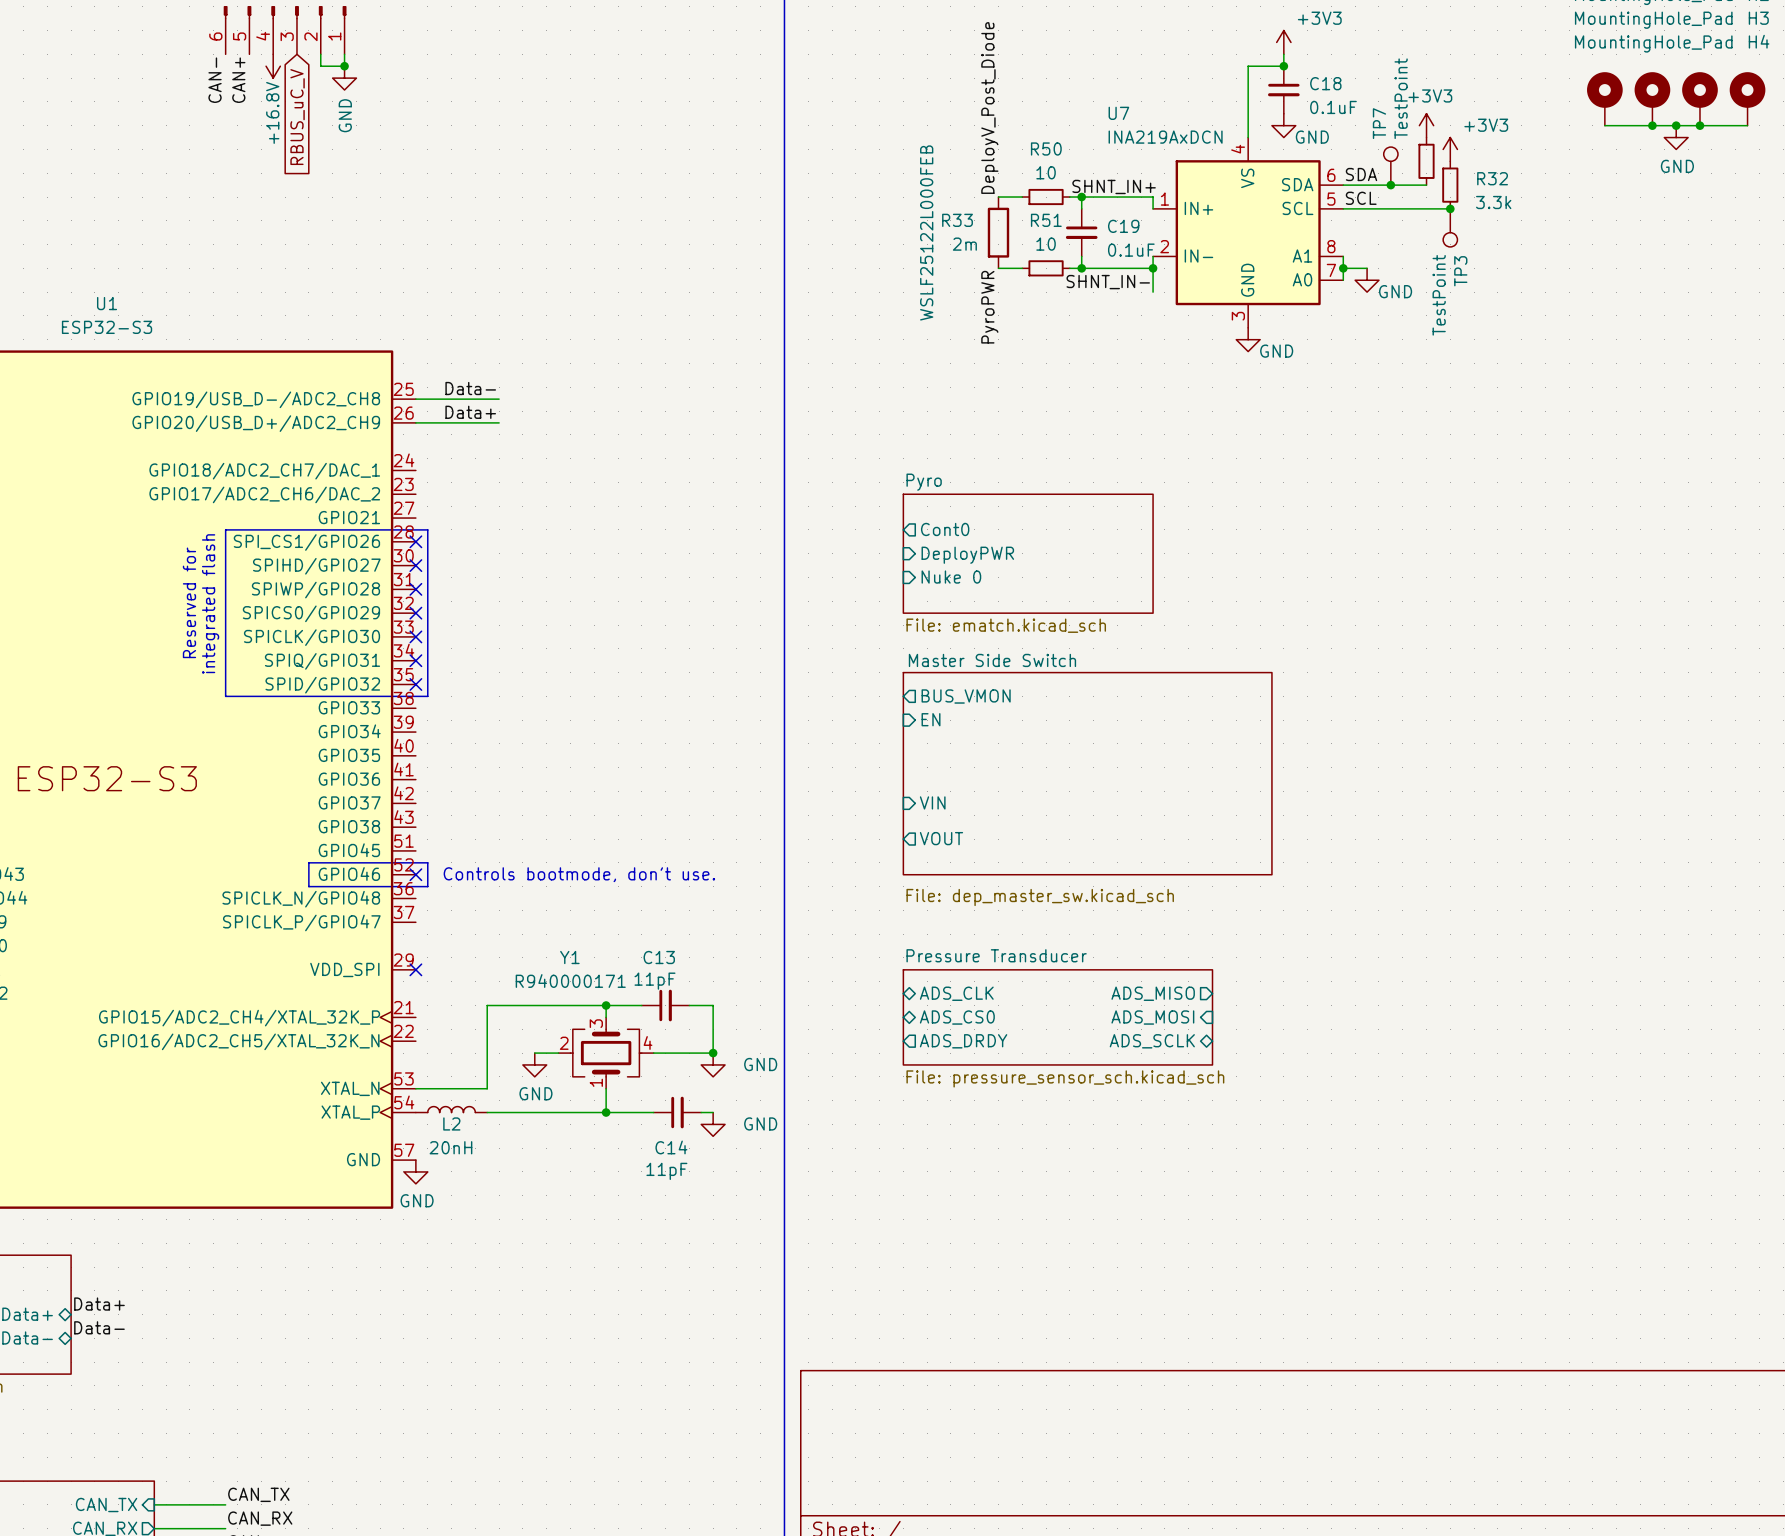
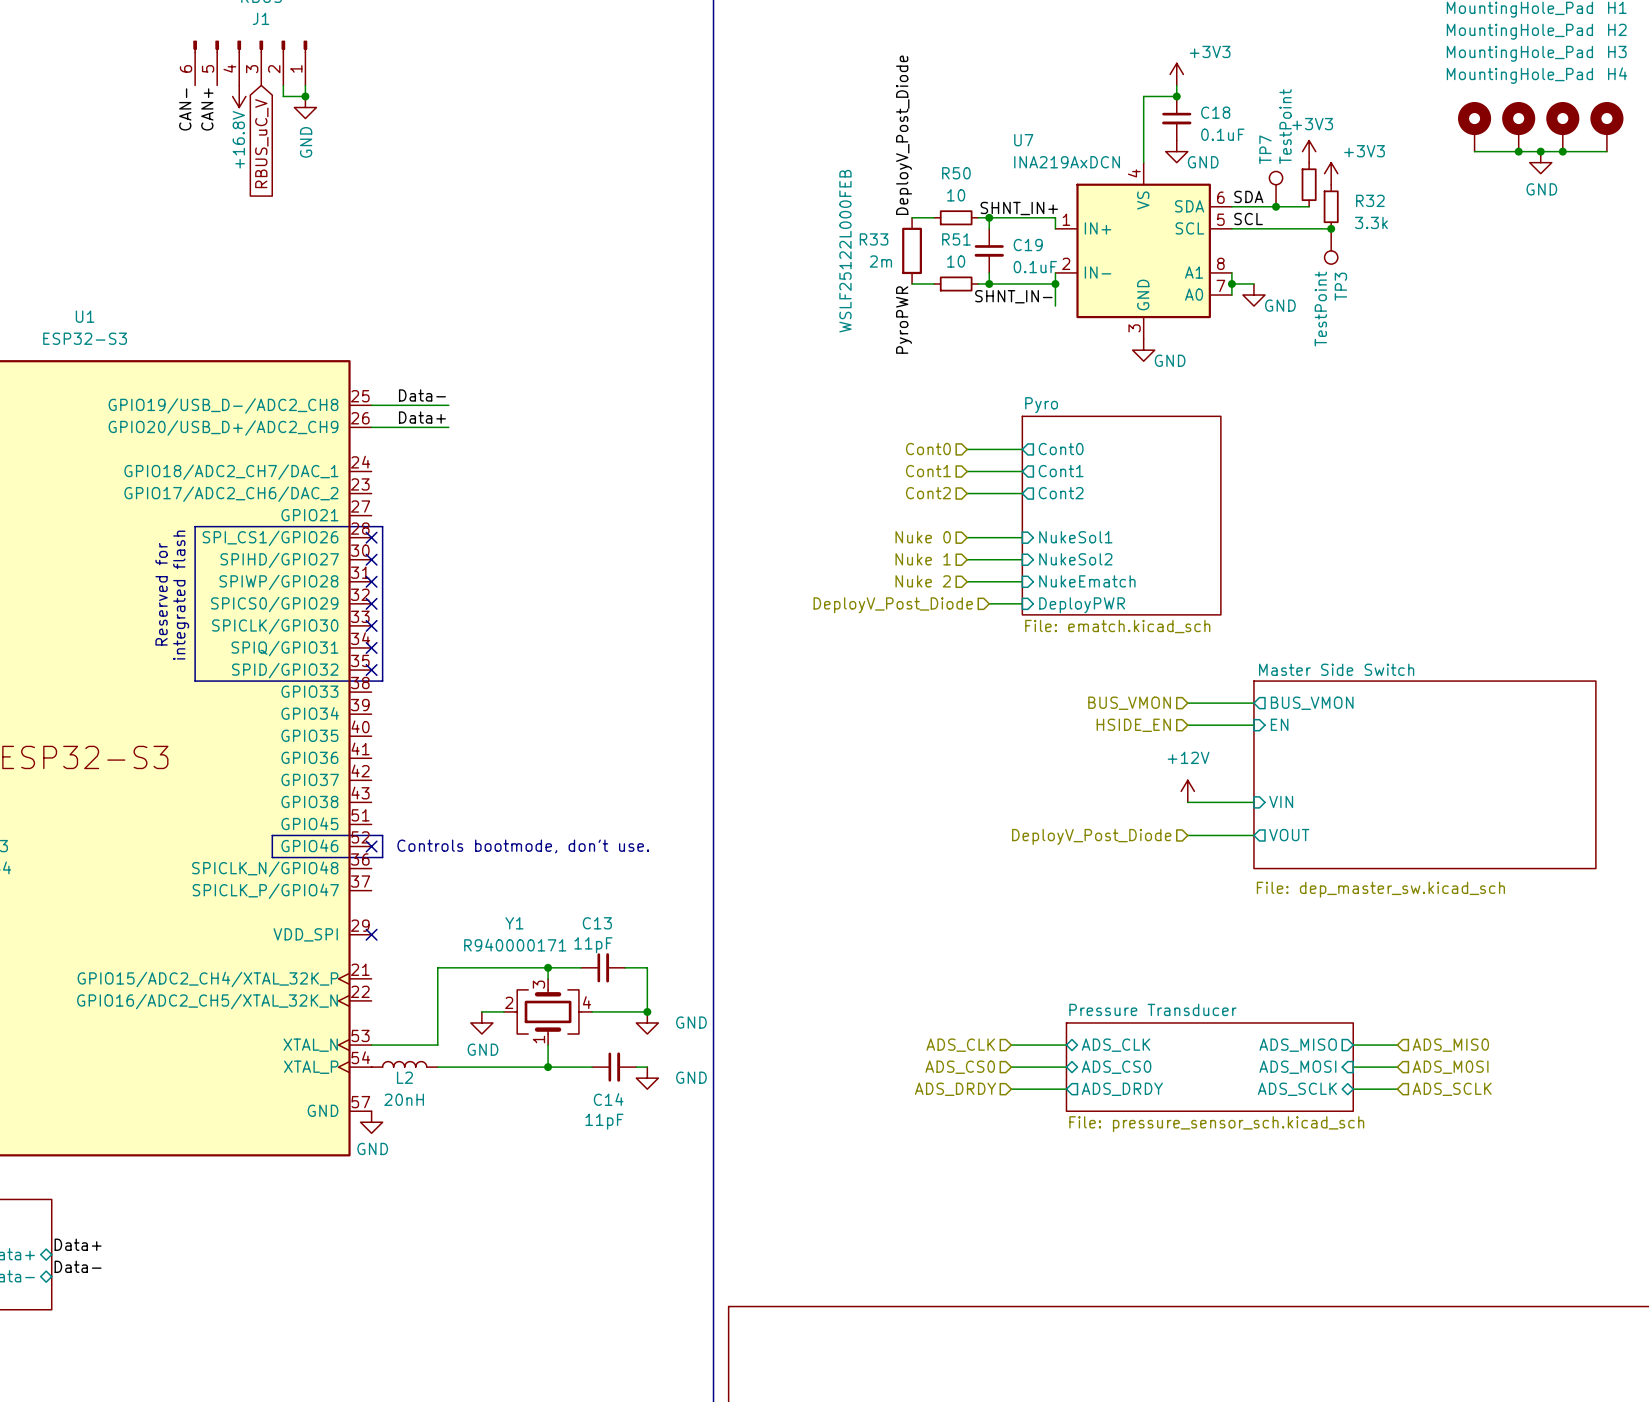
hierarchical label: none -> Cont0 (928, 449)
wire: none -> (967, 449) (1022, 449)
hierarchical label: none -> Cont1 (928, 471)
wire: none -> (967, 471) (1022, 471)
sheet pin: none -> Cont1 (1061, 471)
hierarchical label: none -> Cont2 (928, 493)
sheet pin: none -> Cont2 (1061, 493)
sheet Pyro: none -> File: ematch.kicad_sch (1121, 515)
sheet pin position: Cont0 (945, 529) -> Cont0 (1061, 449)
hierarchical label: none -> Nuke 0 (923, 537)
wire: none -> (967, 537) (1022, 537)
sheet pin: none -> NukeSol1 (1075, 537)
sheet Pyro: File: ematch.kicad_sch (1028, 553) -> none
sheet pin position: DeployPWR (967, 555) -> DeployPWR (1082, 605)
hierarchical label: none -> Nuke 1 (923, 559)
wire: none -> (967, 559) (1022, 559)
sheet pin: none -> NukeSol2 (1075, 559)
sheet pin: Nuke 0 (951, 577) -> none
hierarchical label: none -> Nuke 2 (923, 581)
sheet pin: none -> NukeEmatch (1087, 581)
wire: none -> (967, 581) (1022, 581)
hierarchical label: none -> DeployV_Post_Diode (893, 605)
sheet pin: BUS_VMON (966, 696) -> none
sheet pin: EN (931, 719) -> none
hierarchical label: none -> BUS_VMON (1129, 703)
wire: none -> (1187, 703) (1253, 703)
sheet pin: none -> BUS_VMON (1312, 703)
wire: none -> (1187, 725) (1253, 725)
sheet pin: none -> EN (1279, 724)
hierarchical label: none -> HSIDE_EN (1133, 725)
sheet Master Side Switch: File: dep_master_sw.kicad_sch (1087, 773) -> none
sheet Master Side Switch: none -> File: dep_master_sw.kicad_sch (1424, 774)
sheet pin: VIN (932, 802) -> none
power symbol: none -> +12V (1187, 791)
sheet pin: none -> VIN (1281, 801)
wire: none -> (1187, 802) (1253, 802)
sheet pin: VOUT (941, 838) -> none
wire: none -> (1187, 835) (1253, 835)
sheet pin: none -> VOUT (1289, 835)
hierarchical label: none -> DeployV_Post_Diode (1091, 836)
sheet pin: ADS_CLK (956, 993) -> none
sheet pin: ADS_MISO (1153, 993) -> none
sheet pin: ADS_CS0 (957, 1017) -> none
sheet Pressure Transducer: File: pressure_sensor_sch.kicad_sch (1057, 1017) -> none
sheet pin: ADS_MOSI (1152, 1017) -> none
sheet pin: ADS_DRDY (963, 1041) -> none
sheet pin: ADS_SCLK (1152, 1041) -> none
hierarchical label: none -> ADS_CLK (960, 1045)
wire: none -> (1011, 1045) (1066, 1045)
sheet pin: none -> ADS_CLK (1116, 1045)
sheet pin: none -> ADS_MISO (1298, 1045)
wire: none -> (1353, 1045) (1397, 1045)
hierarchical label: none -> ADS_MIS0 (1450, 1045)
hierarchical label: none -> ADS_CS0 (960, 1067)
wire: none -> (1011, 1067) (1066, 1067)
sheet pin: none -> ADS_CS0 (1116, 1067)
sheet Pressure Transducer: none -> File: pressure_sensor_sch.kicad_sch (1209, 1067)
sheet pin: none -> ADS_MOSI (1297, 1067)
wire: none -> (1353, 1067) (1397, 1067)
hierarchical label: none -> ADS_M0SI (1450, 1067)
hierarchical label: none -> ADS_DRDY (955, 1089)
wire: none -> (1011, 1089) (1066, 1089)
sheet pin: none -> ADS_DRDY (1122, 1089)
sheet pin: none -> ADS_SCLK (1297, 1089)
wire: none -> (1353, 1089) (1397, 1089)
hierarchical label: none -> ADS_SCLK (1452, 1089)

